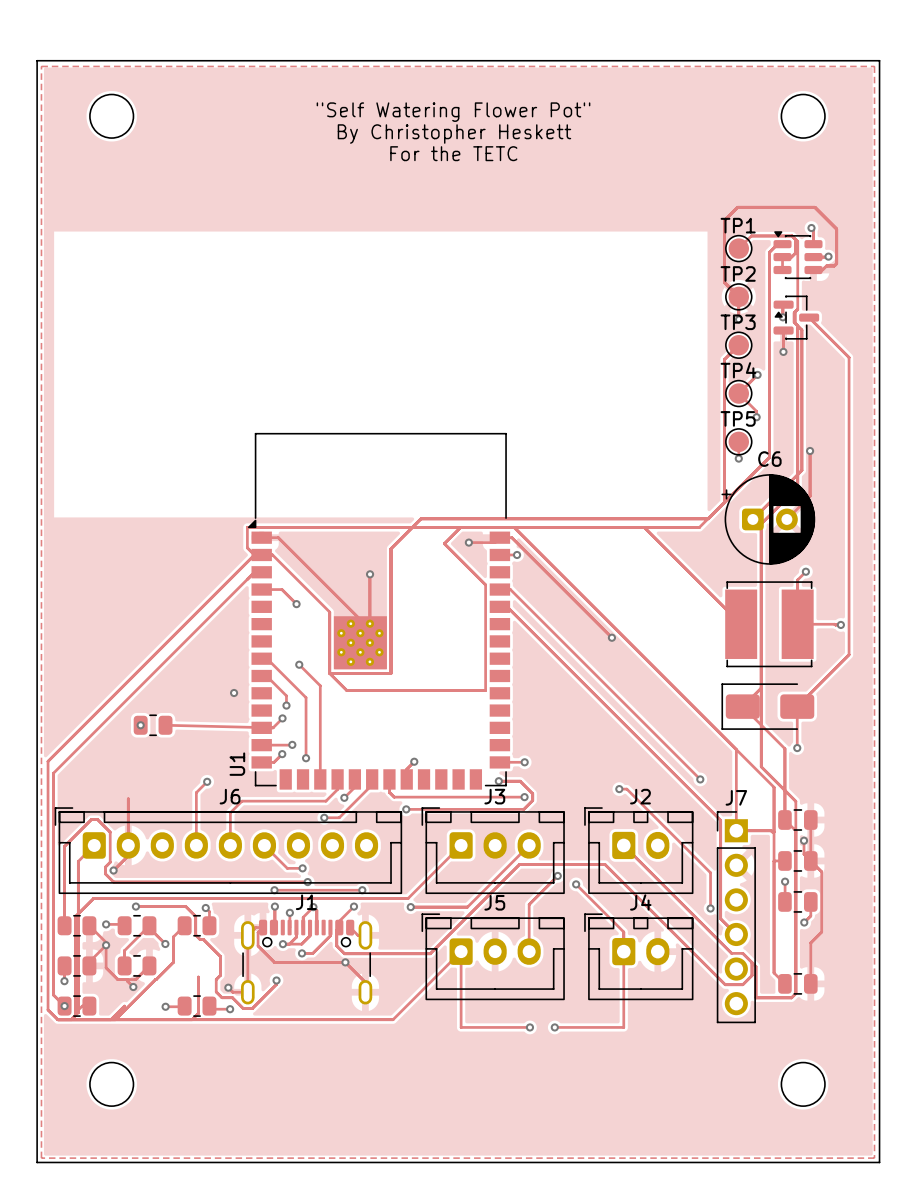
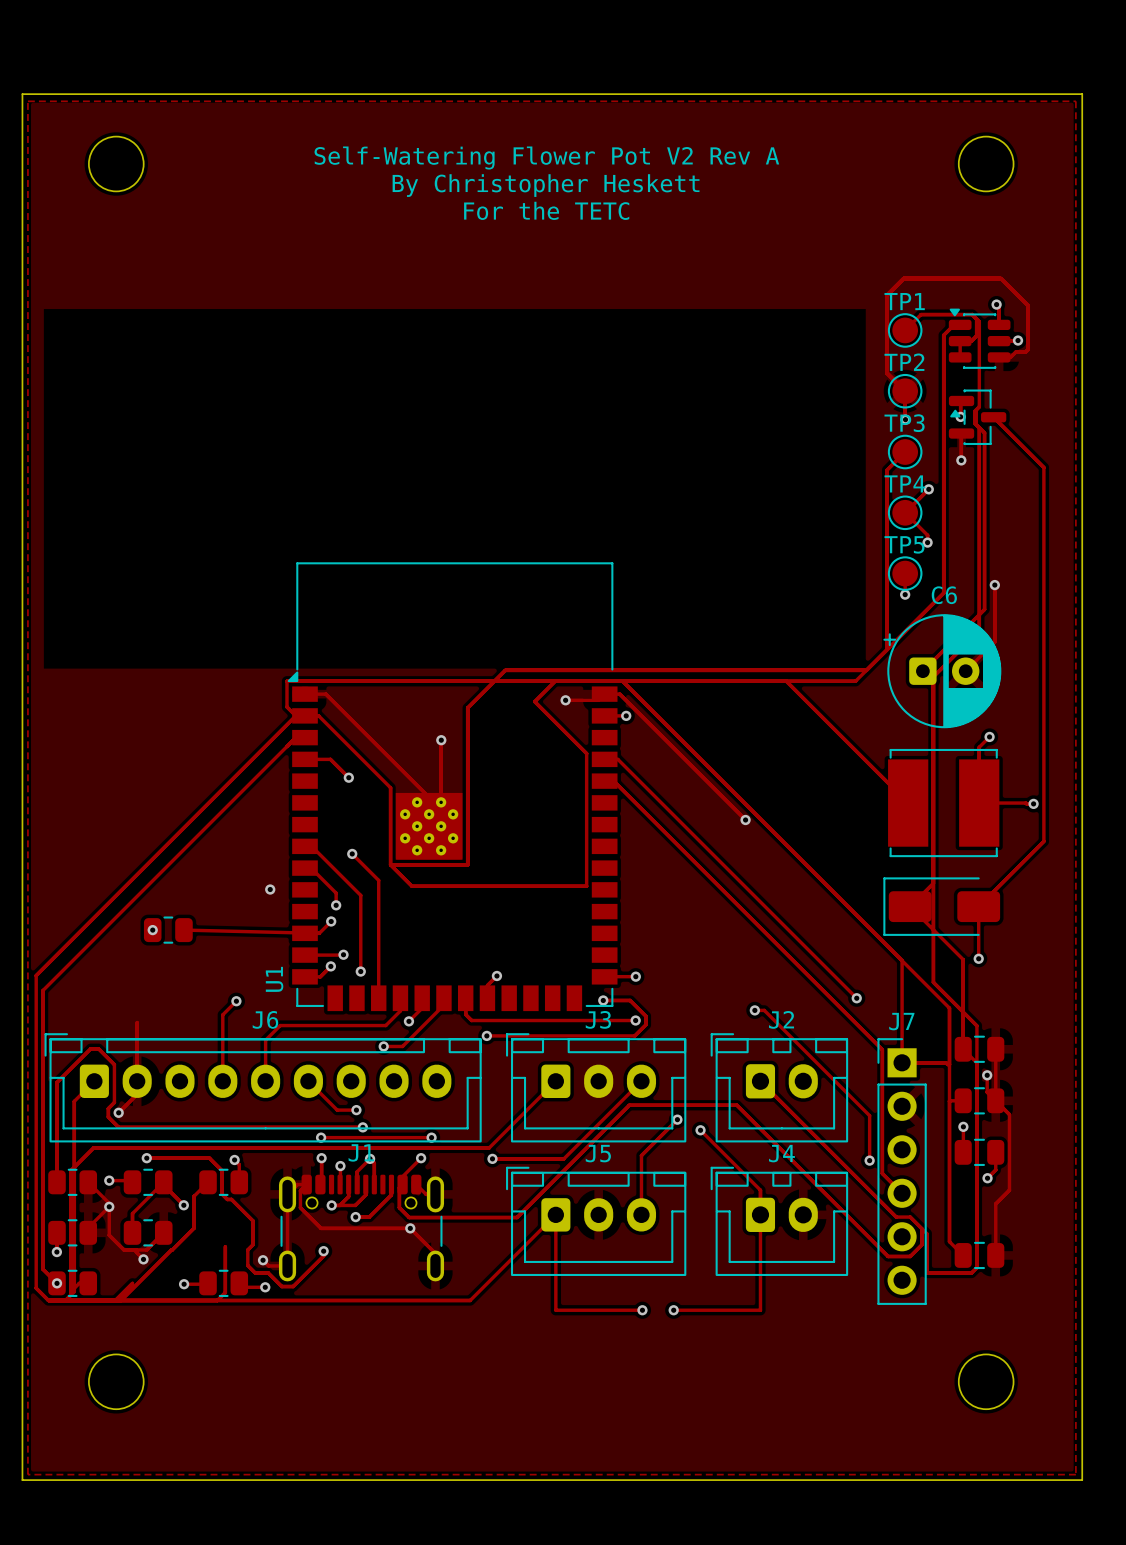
text: "Self Watering Flower Pot" (453, 112) -> Self-Watering Flower Pot V2 Rev A (546, 158)

